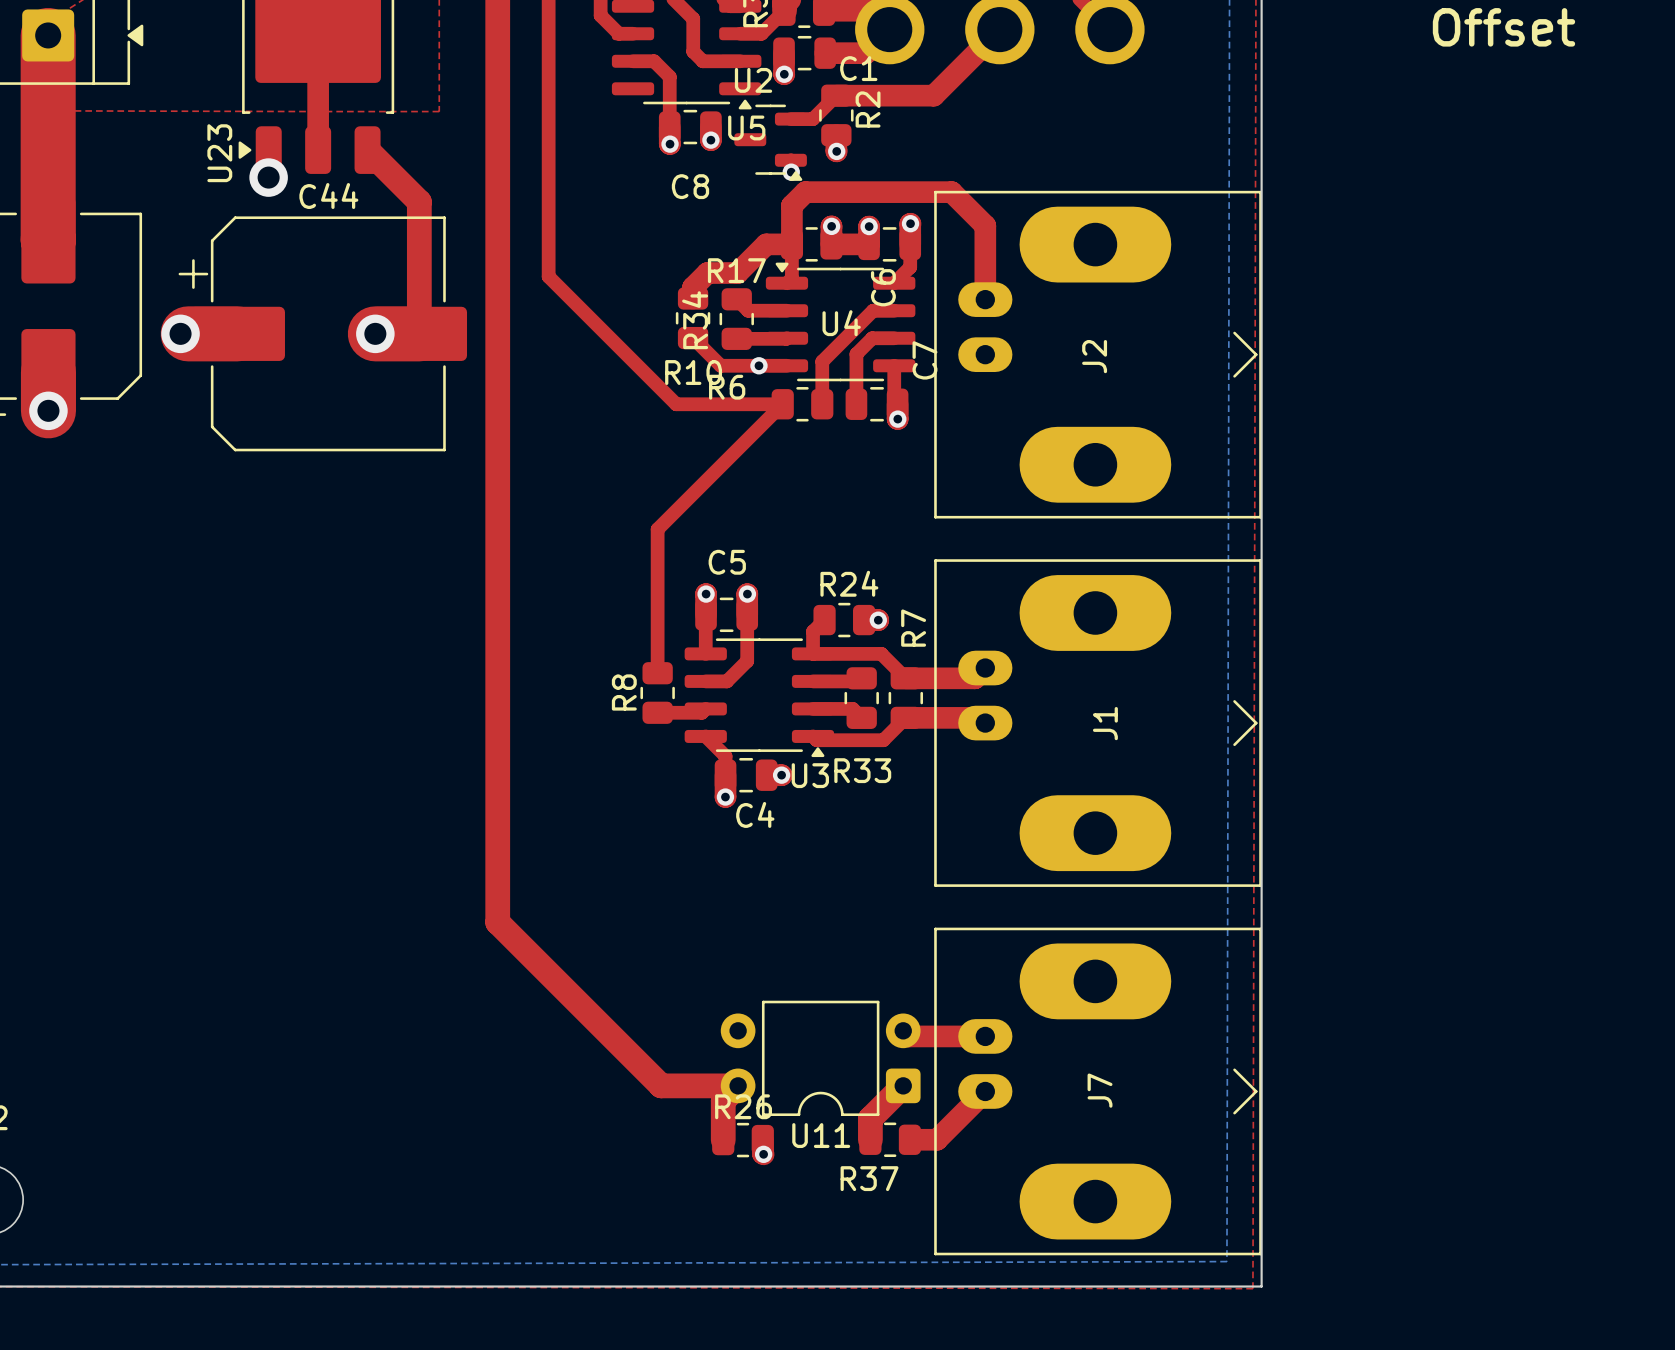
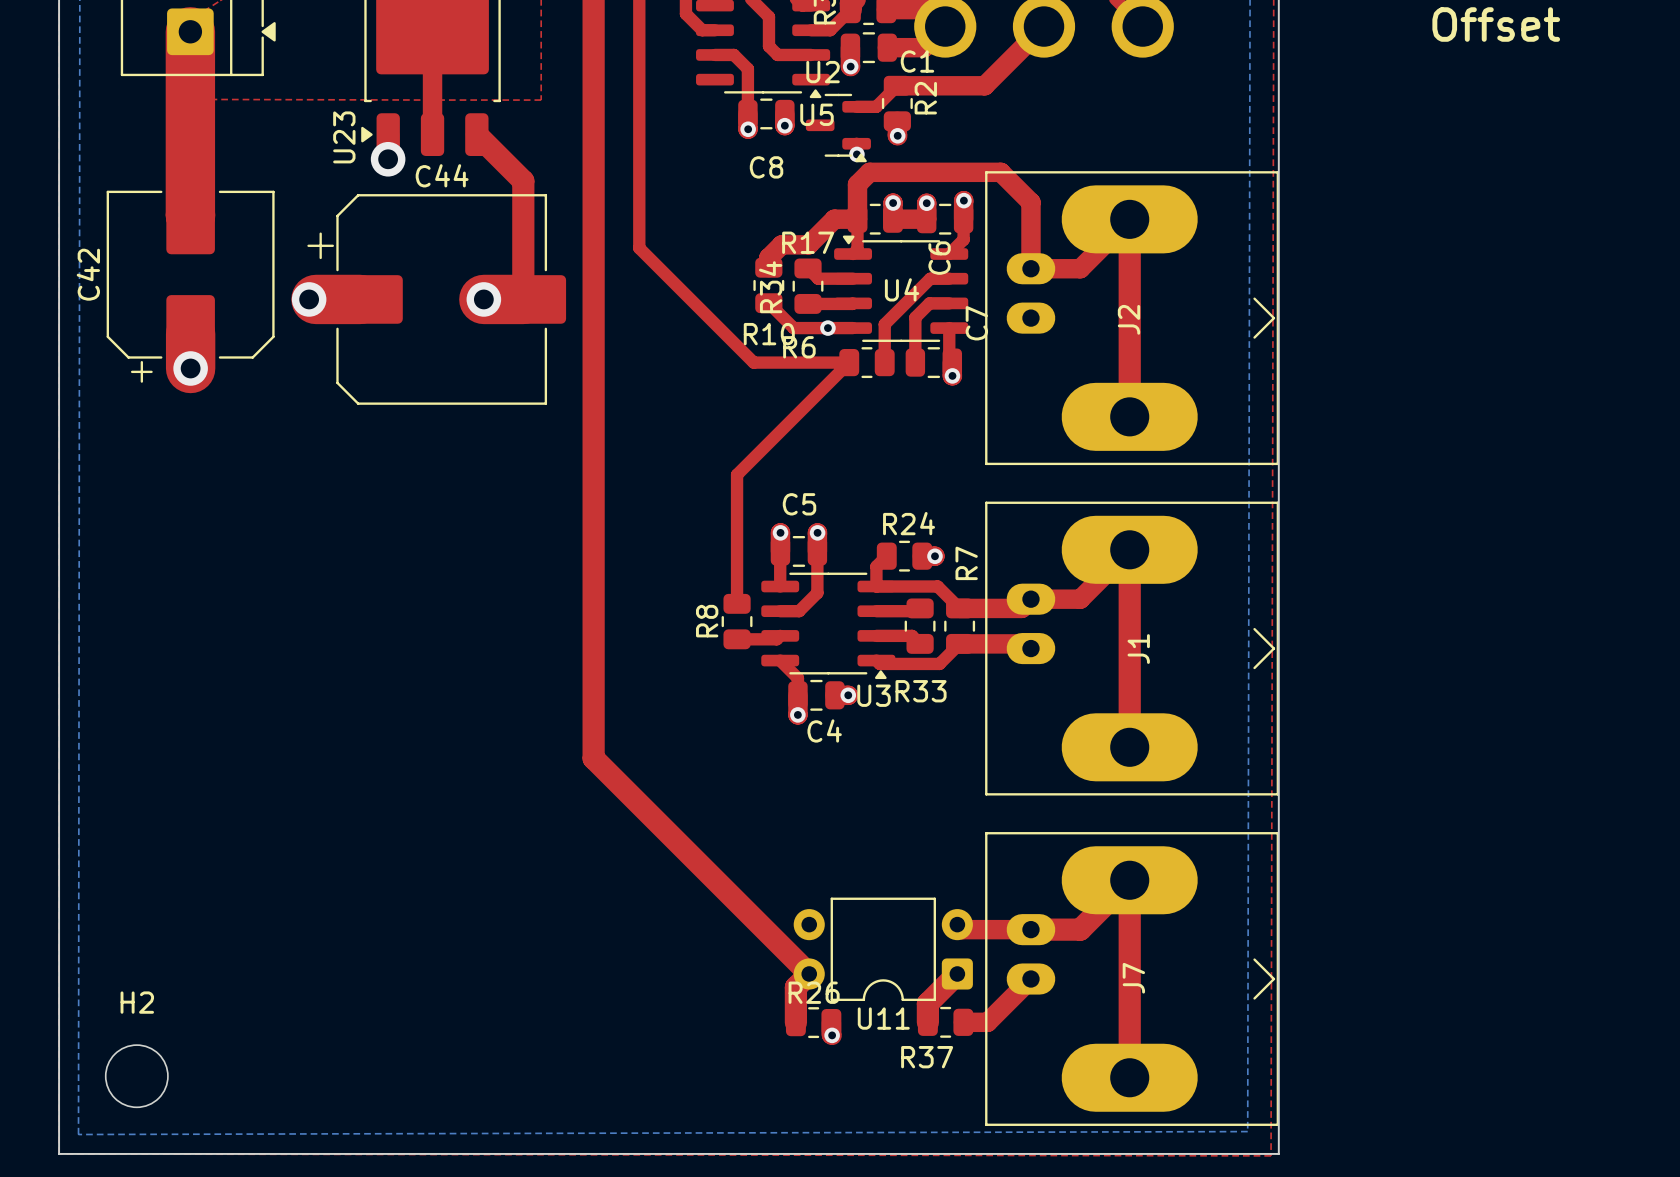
top track: none -> (1030, 268) (1080, 268) (1129, 219) (1129, 416)
top track: none -> (1030, 599) (1080, 599) (1129, 549) (1129, 747)
top track: (497, 845) (497, 922) (661, 1085) (738, 1085) -> (593, 758) (809, 973)
top track: none -> (1030, 929) (1080, 929) (1129, 880) (1129, 1077)

